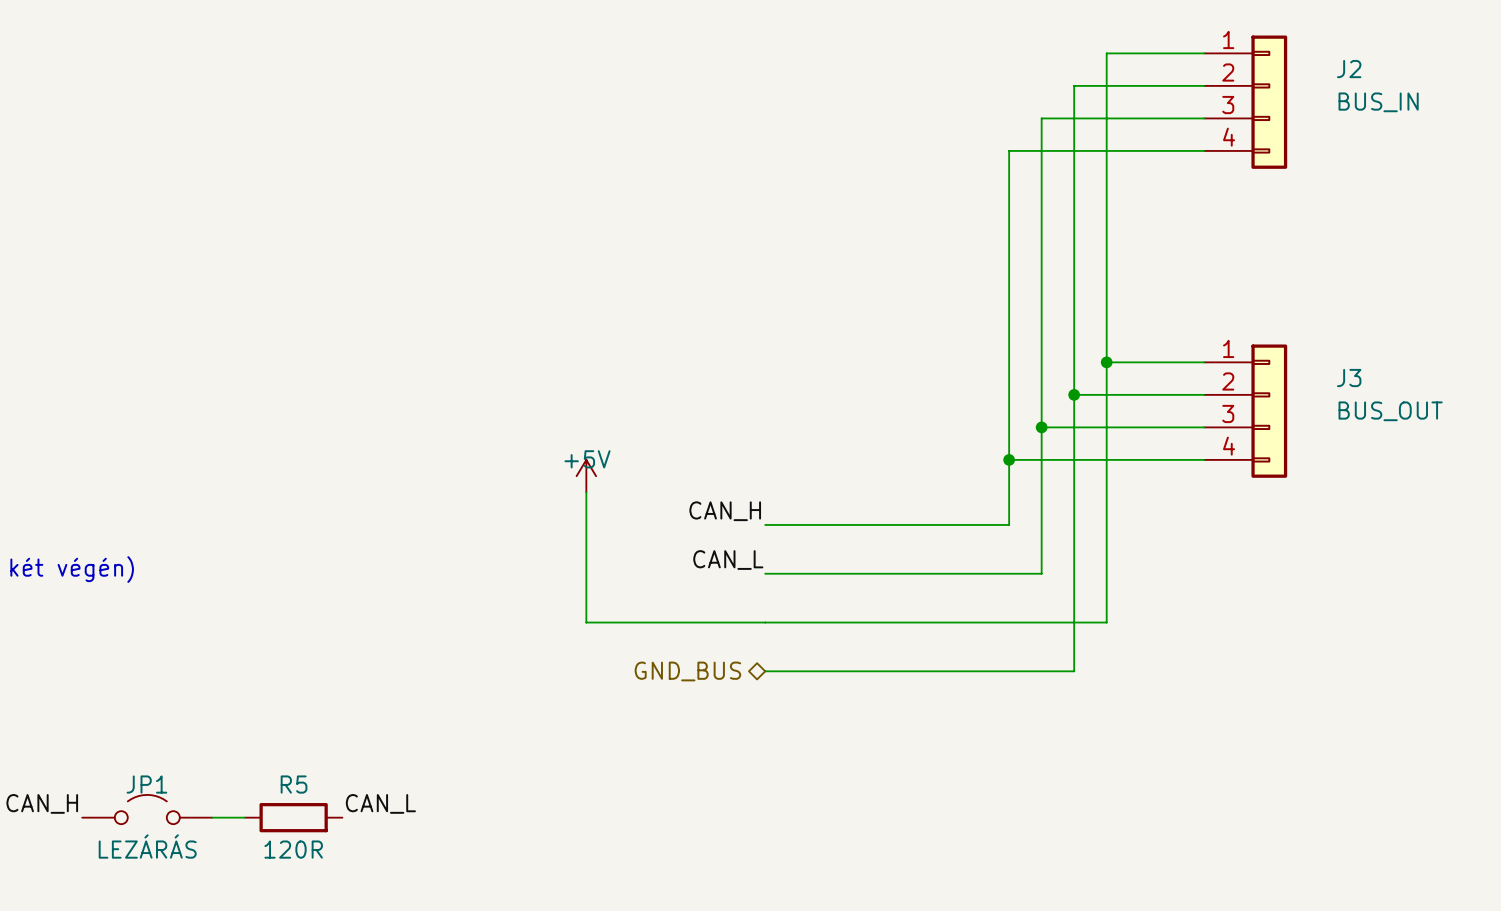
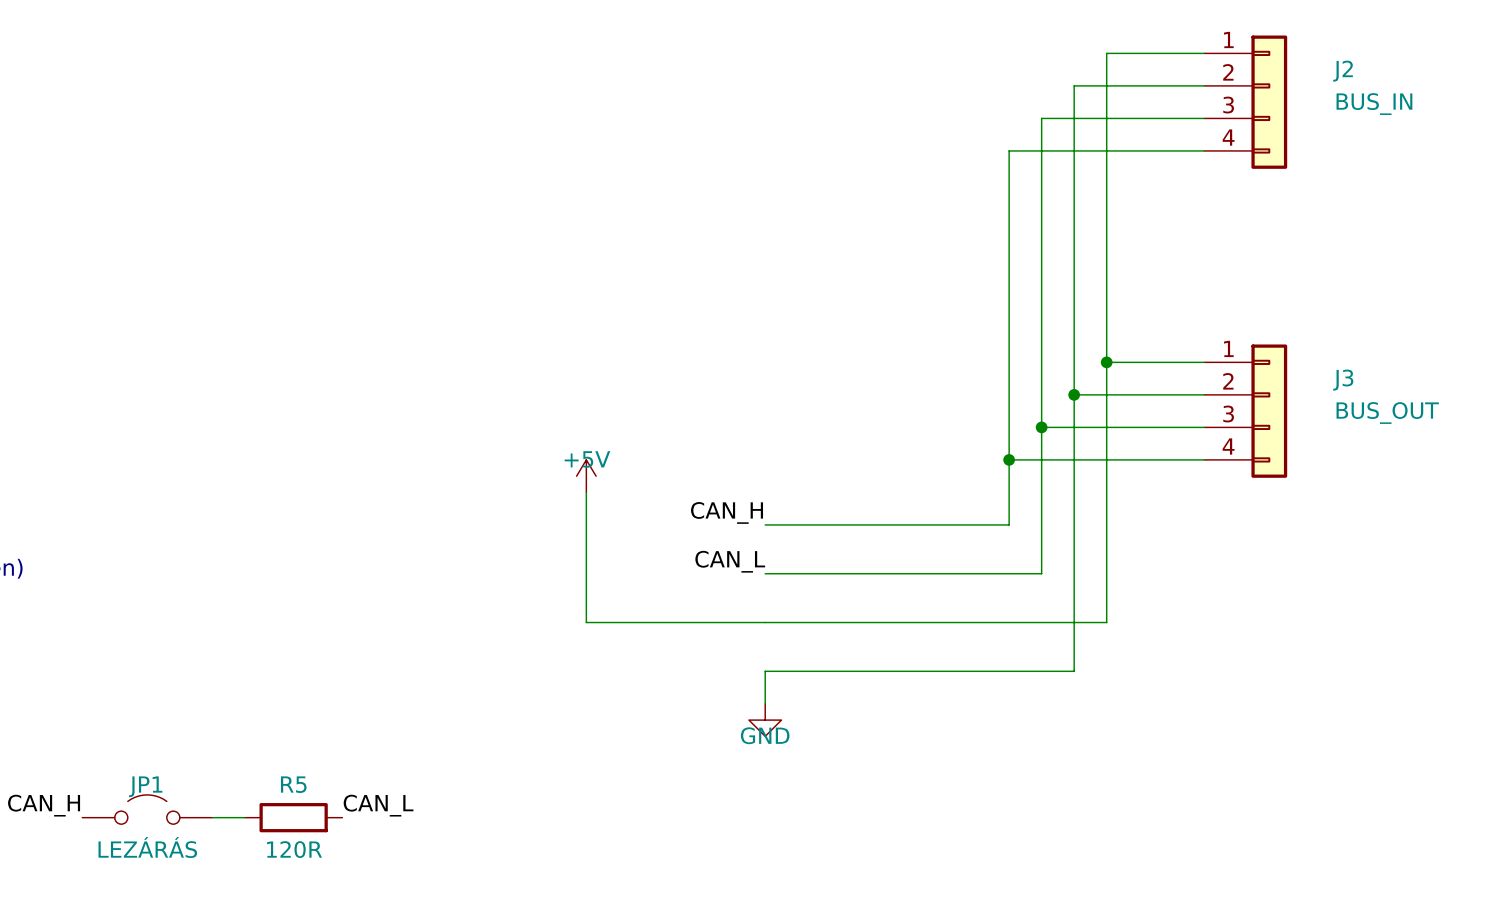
hierarchical label: GND_BUS (687, 671) -> none
wire: none -> (765, 671) (765, 703)
power symbol: none -> GND (765, 720)

